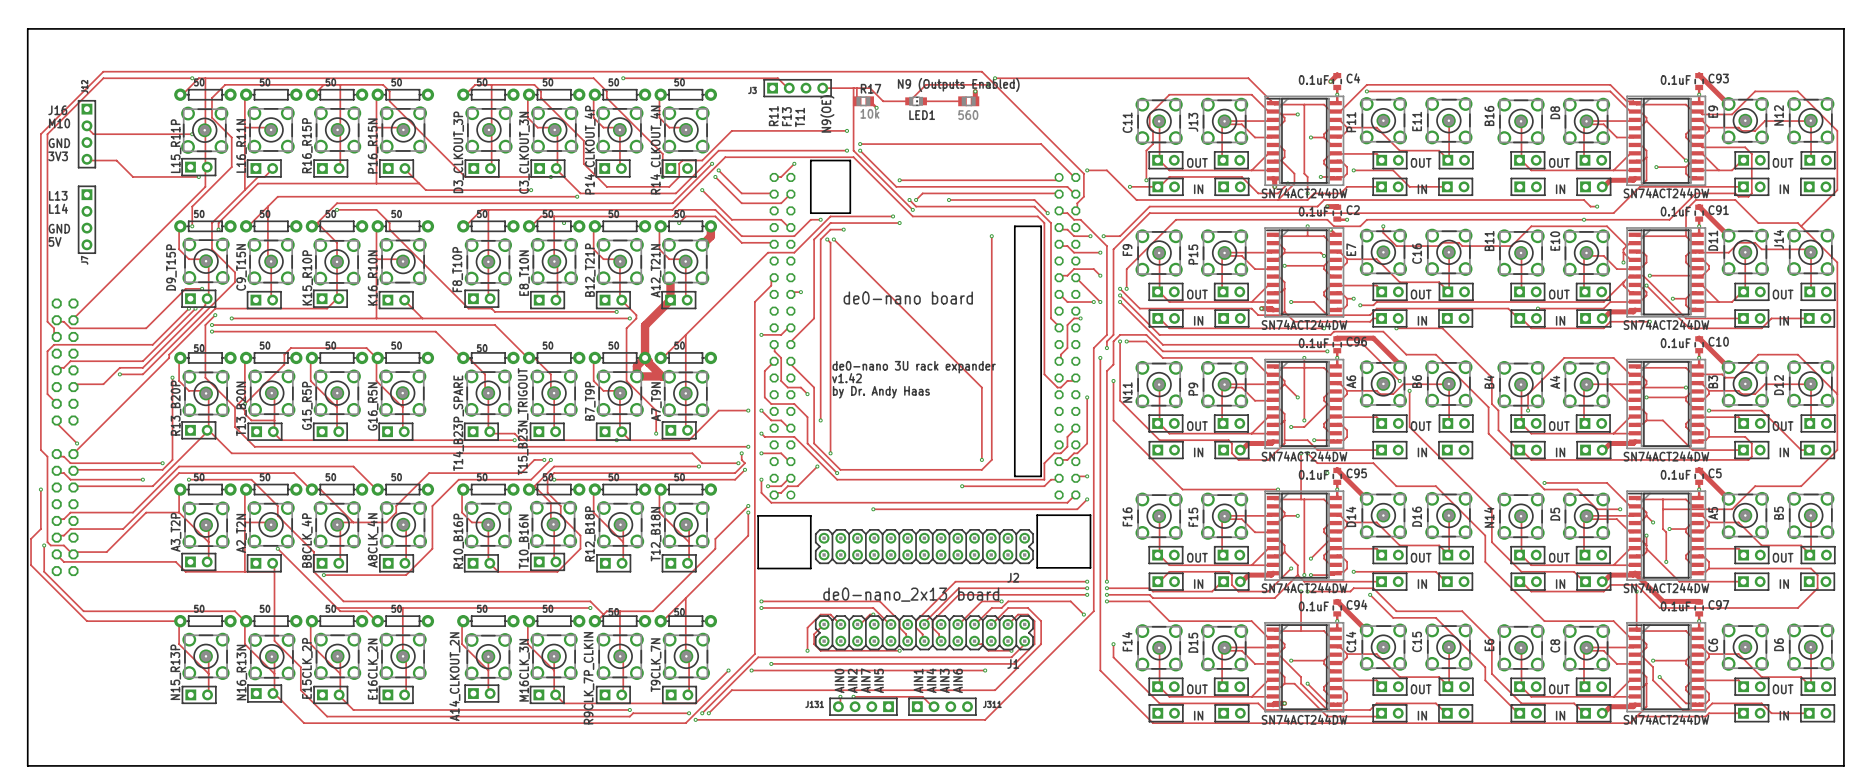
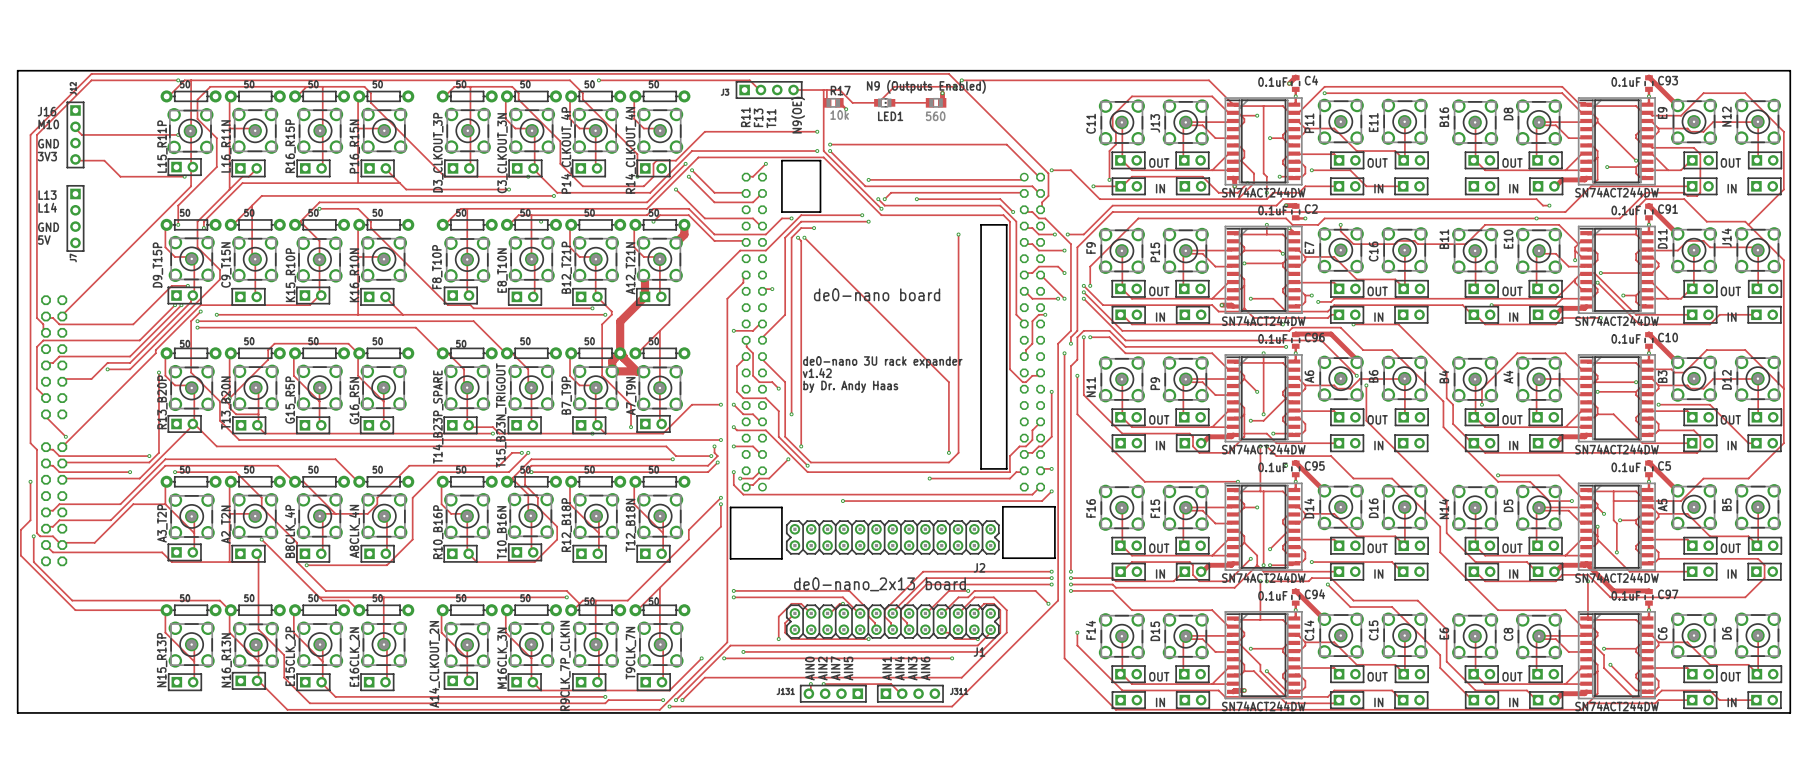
board edge: (27, 68) (27, 28) (1843, 28) (1843, 68) -> (17, 70) (1790, 70)
board edge: (27, 726) (27, 765) (1843, 765) (1843, 726) -> (17, 712) (1790, 712)

